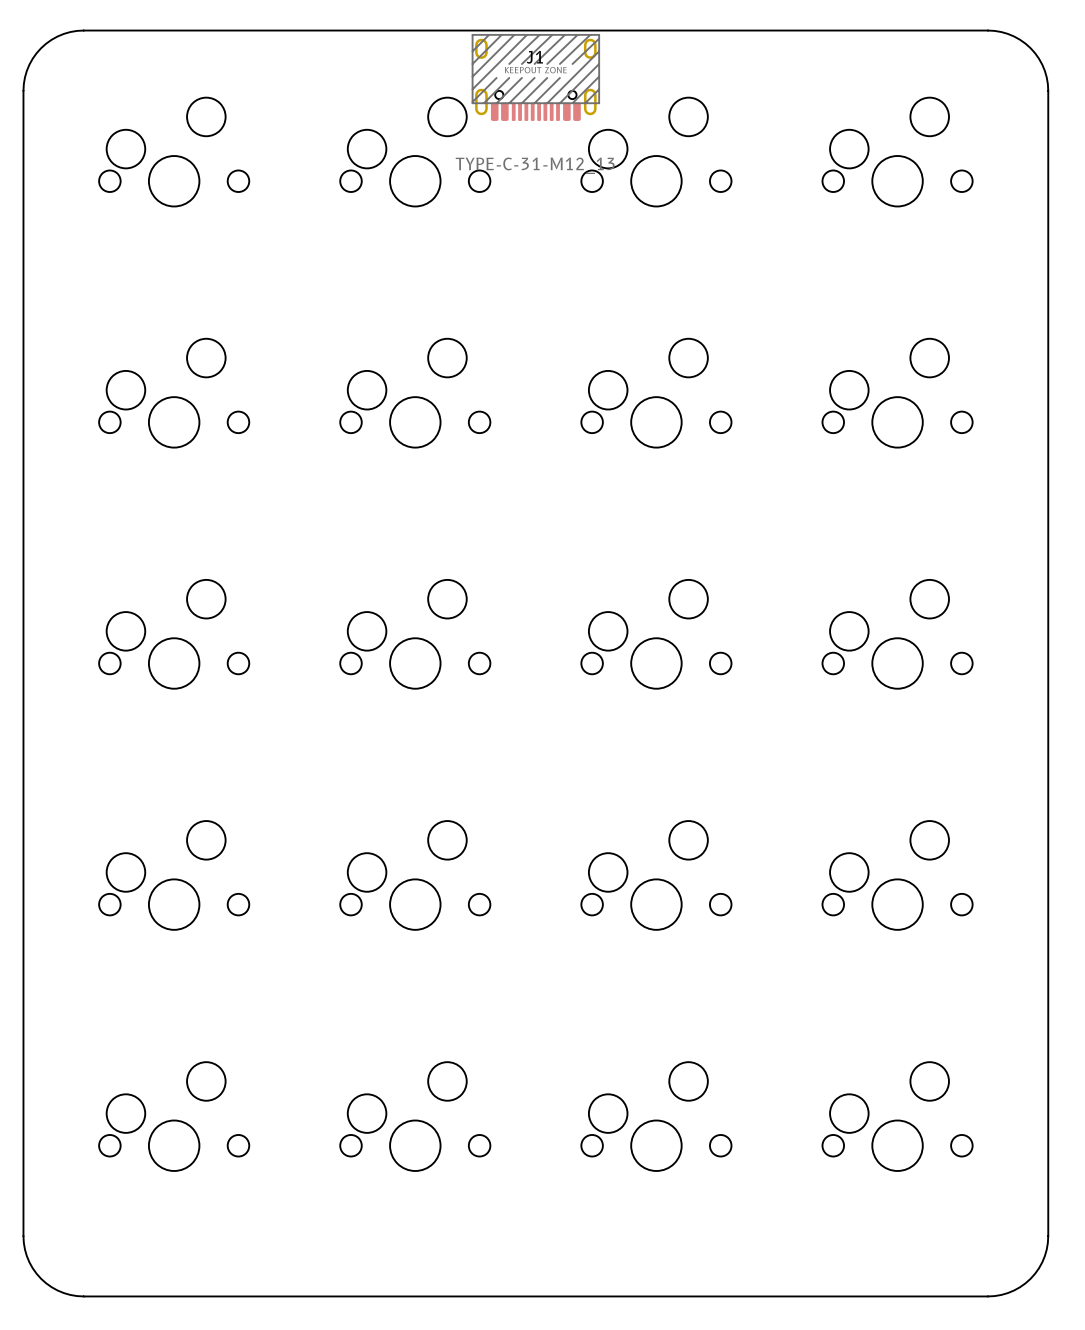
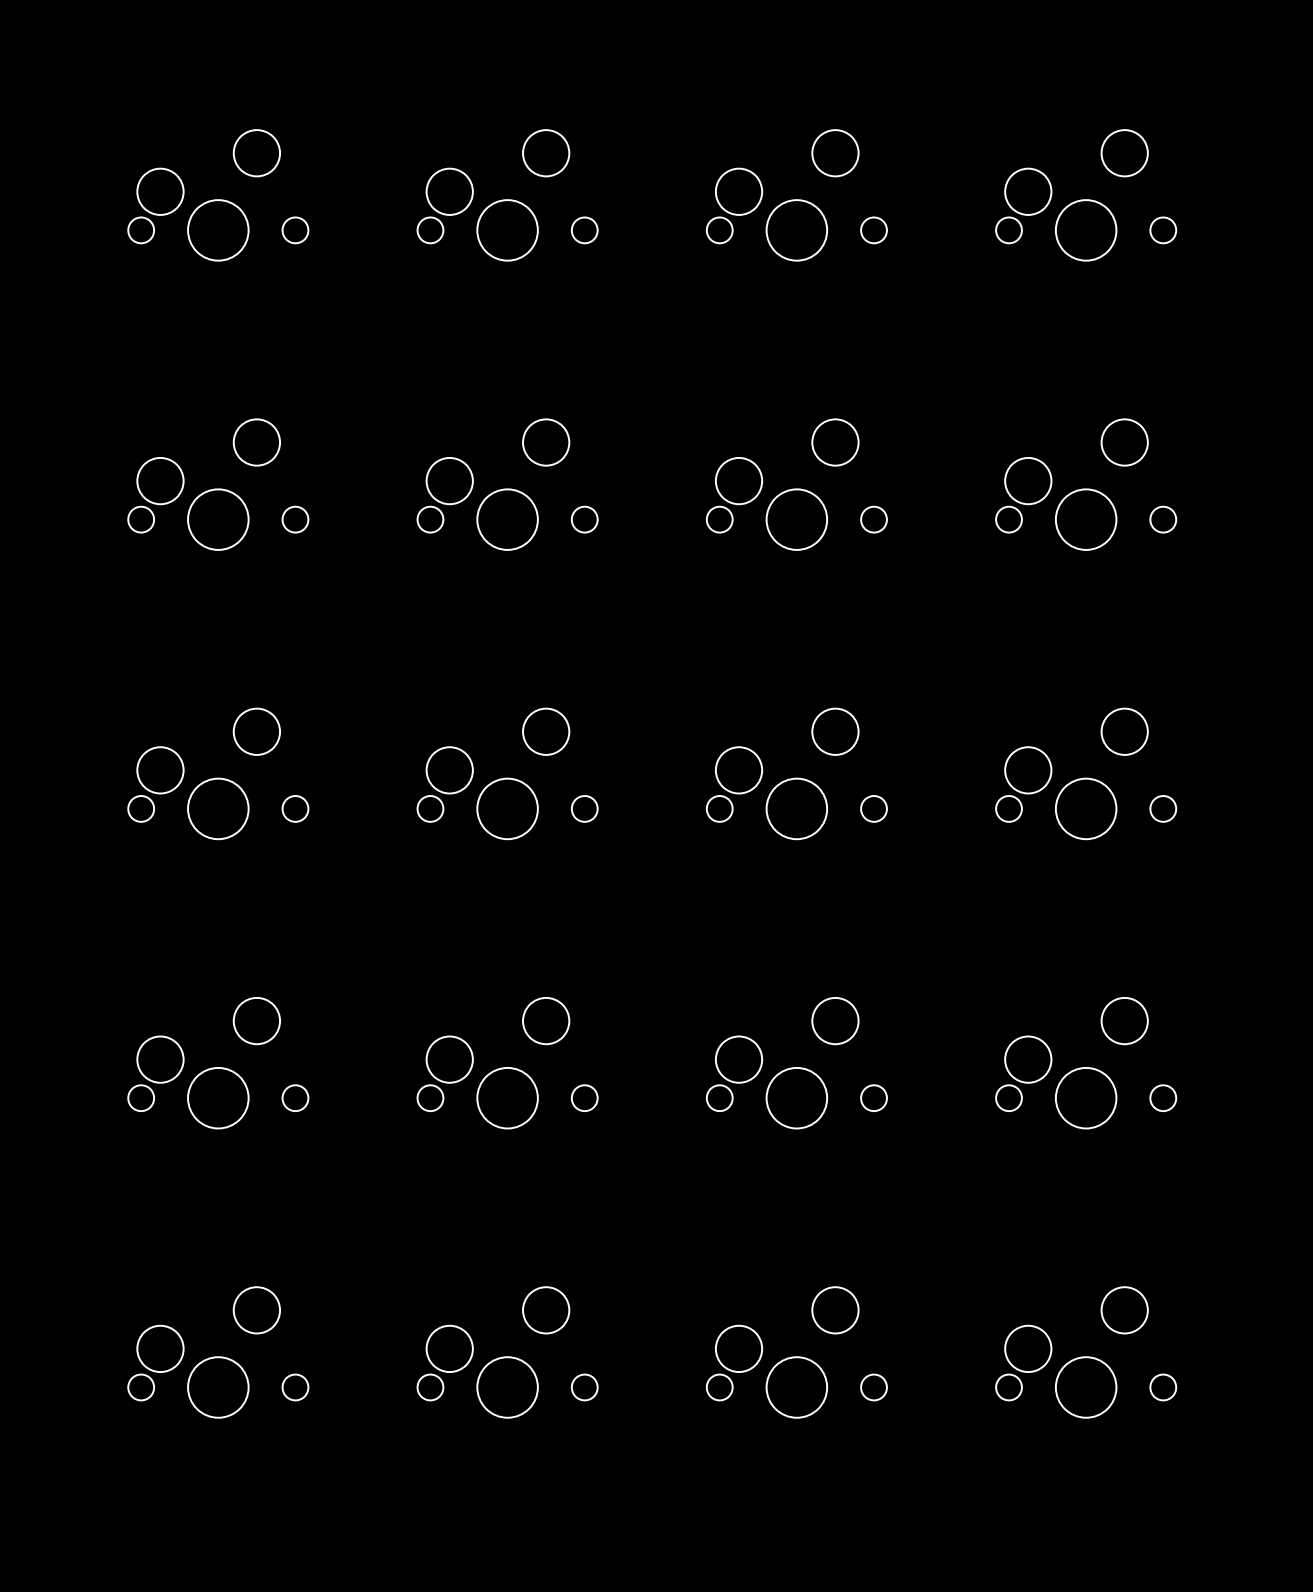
board edge: (83, 30) (987, 30) (1001, 32) (1014, 36) (1025, 43) (1035, 53) (1044, 70) (1048, 90) (1048, 1236) (1046, 1249) (1042, 1262) (1035, 1273) (1025, 1283) (1007, 1293) (987, 1296) (83, 1296) (70, 1294) (57, 1290) (46, 1283) (36, 1273) (26, 1256) (23, 1236) (23, 90) (26, 70) (32, 58) (41, 48) (57, 36) (70, 32) (83, 30) -> none
J1: TYPE-C-31-M12_13 (535, 77) -> none

